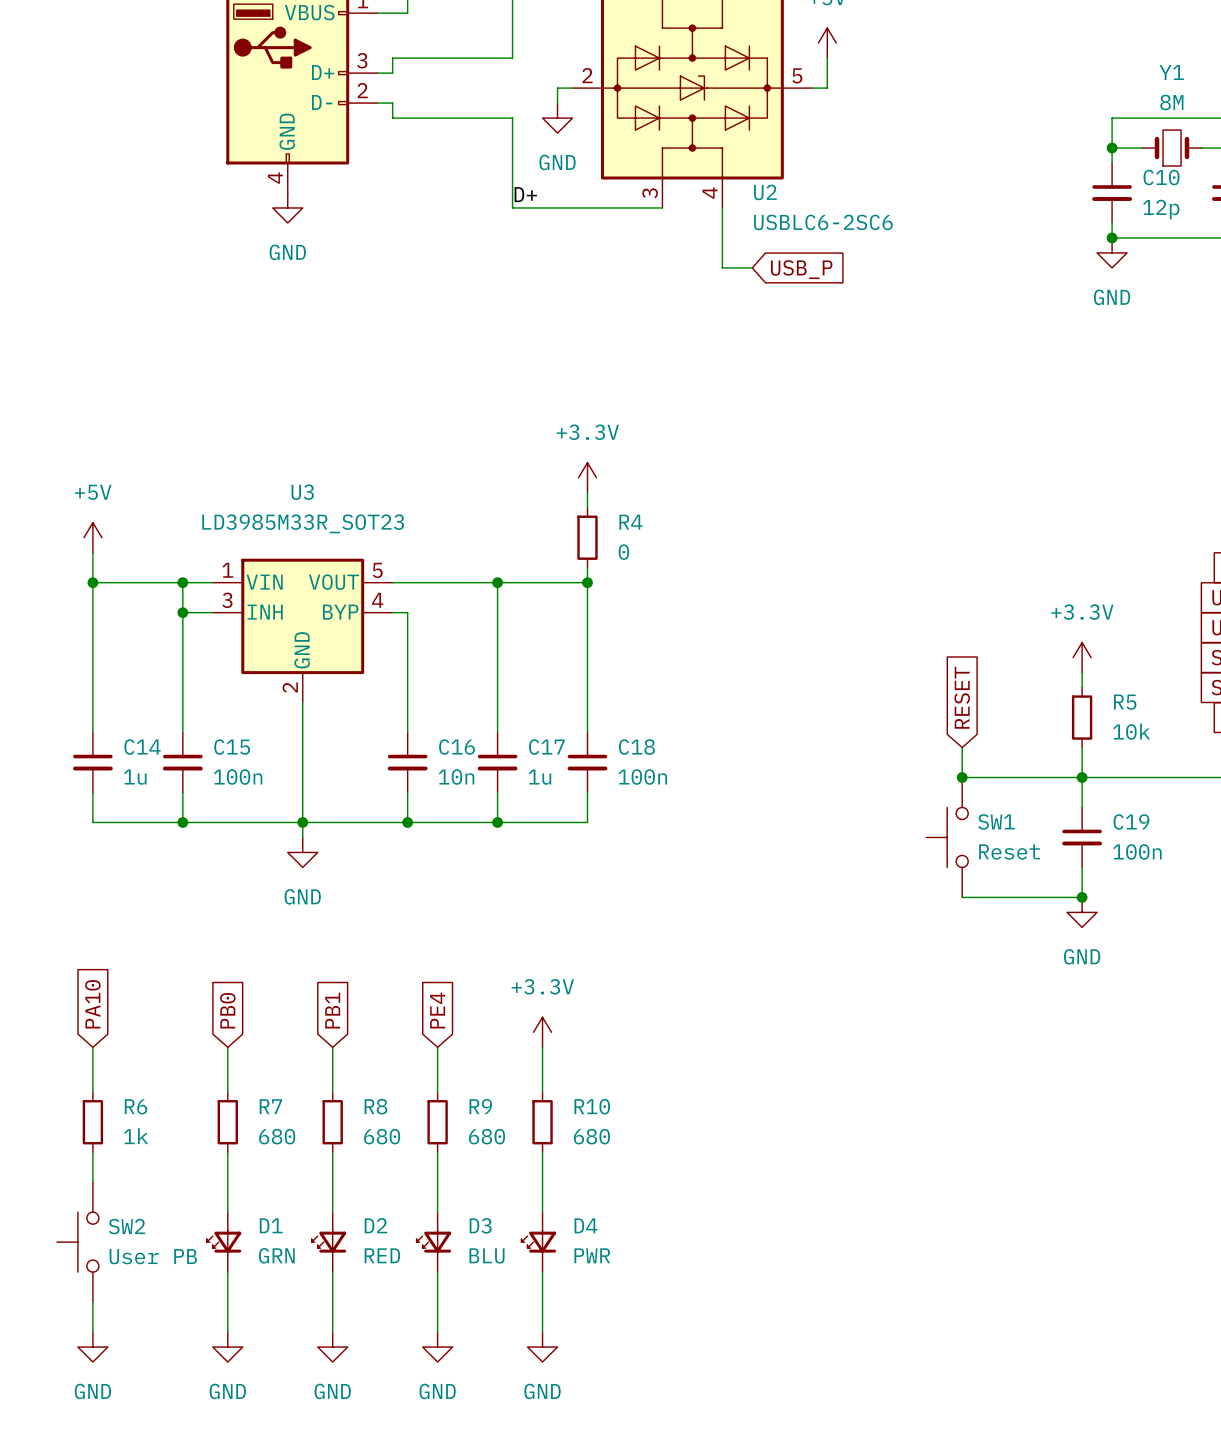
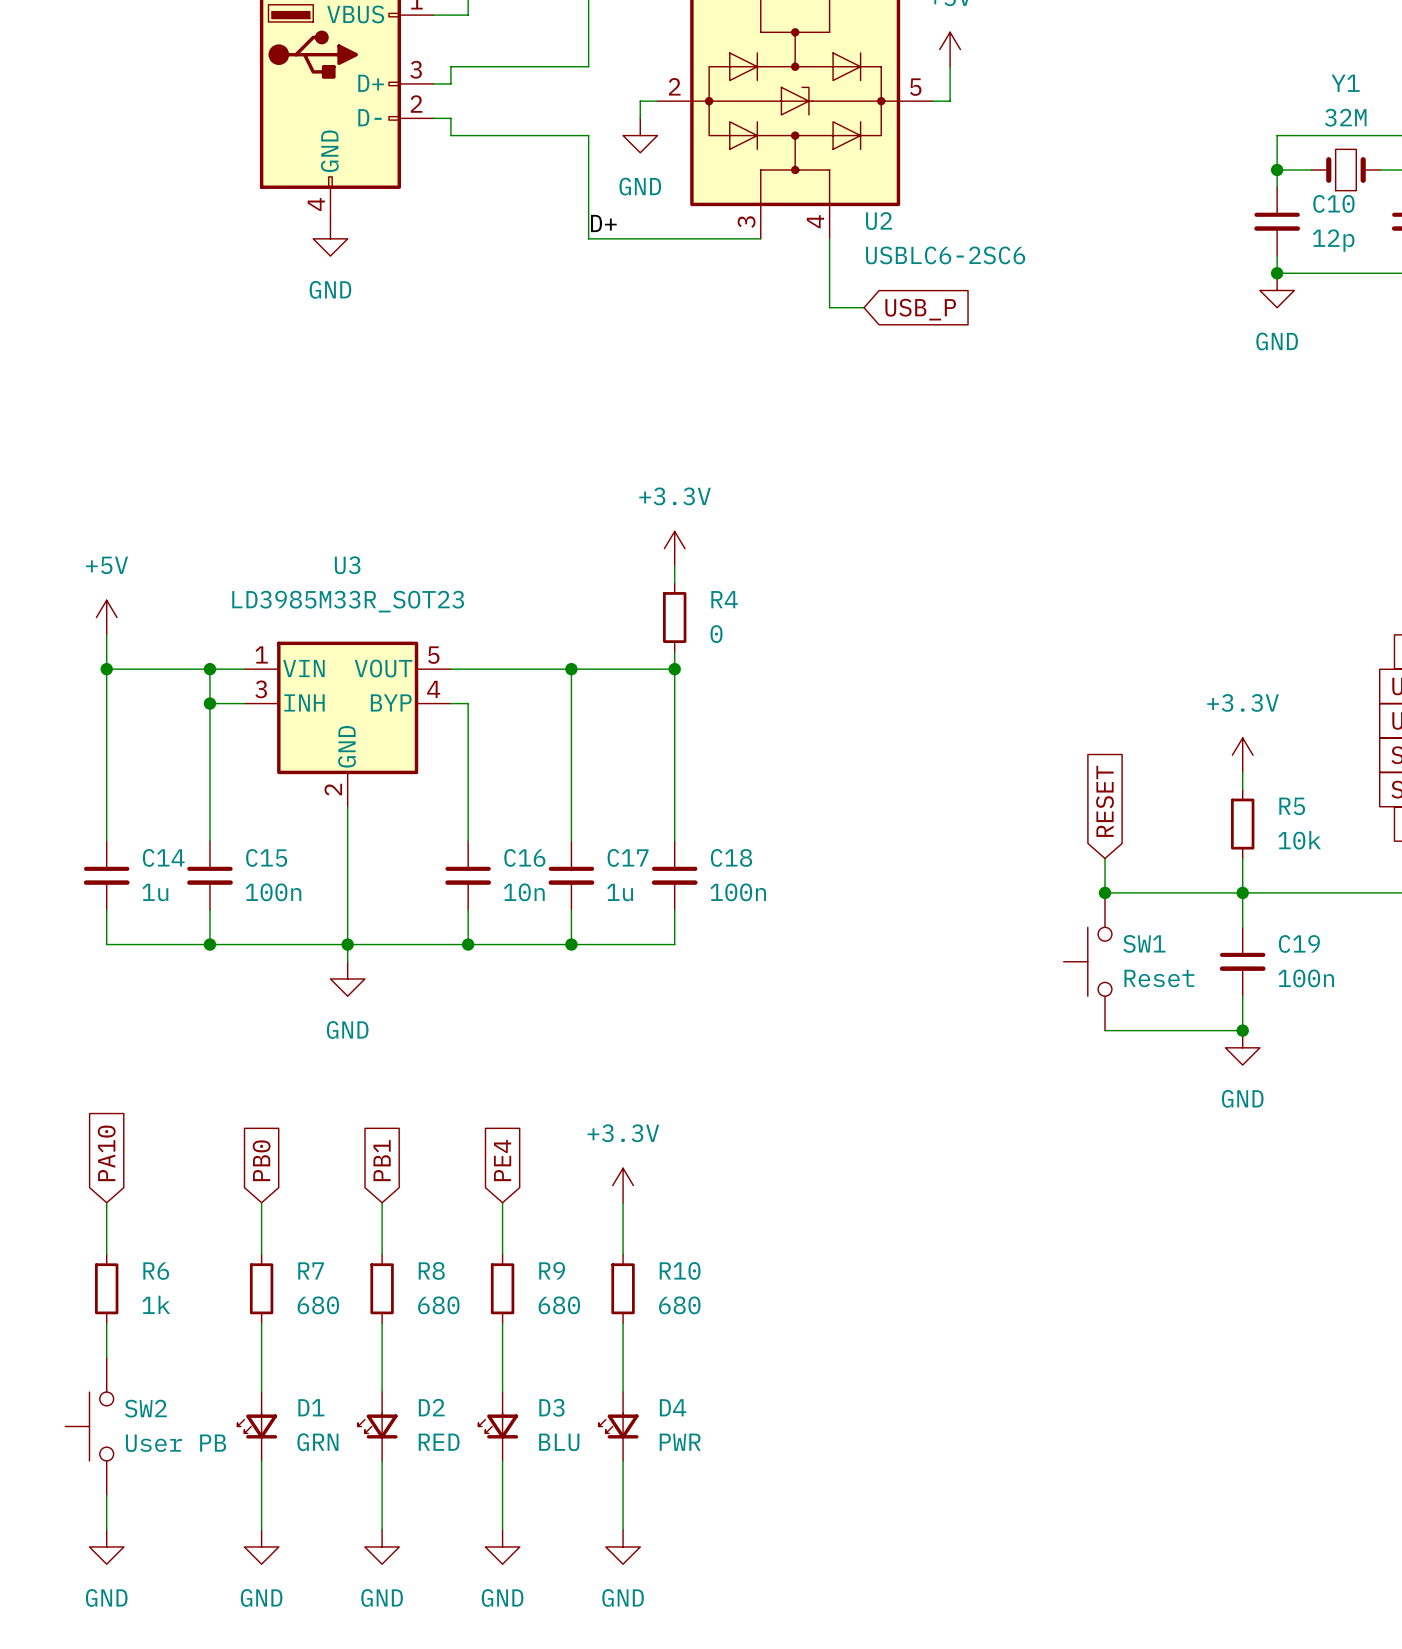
Y1 value: 8M (1171, 102) -> 32M (1345, 117)

